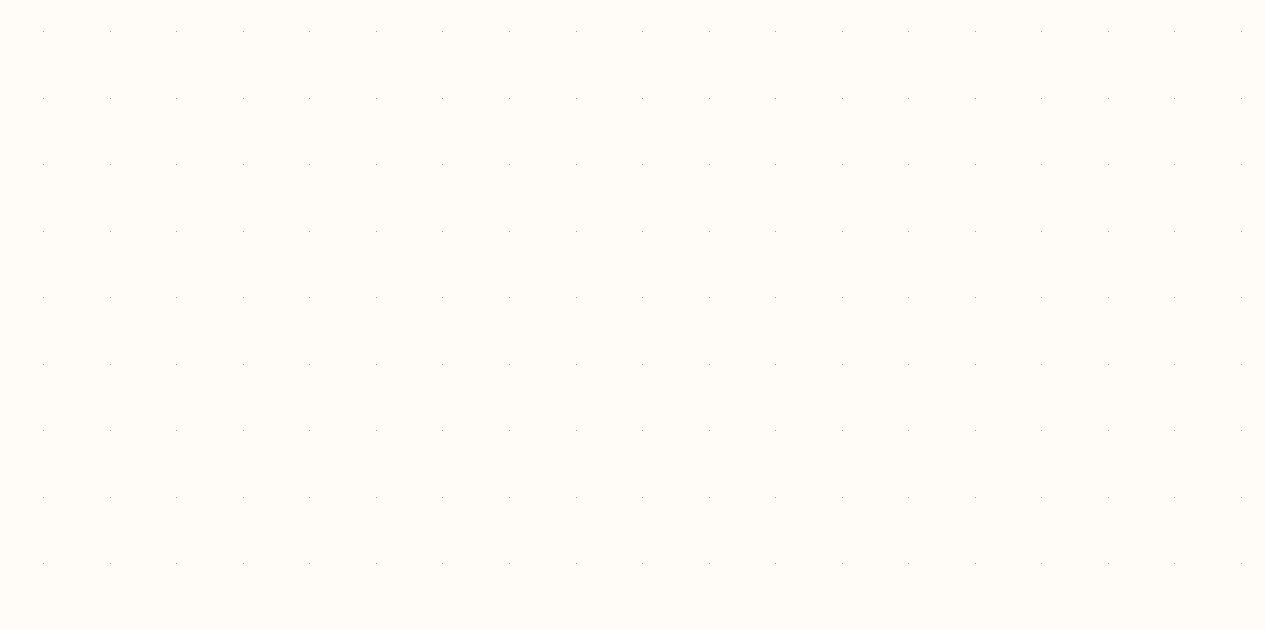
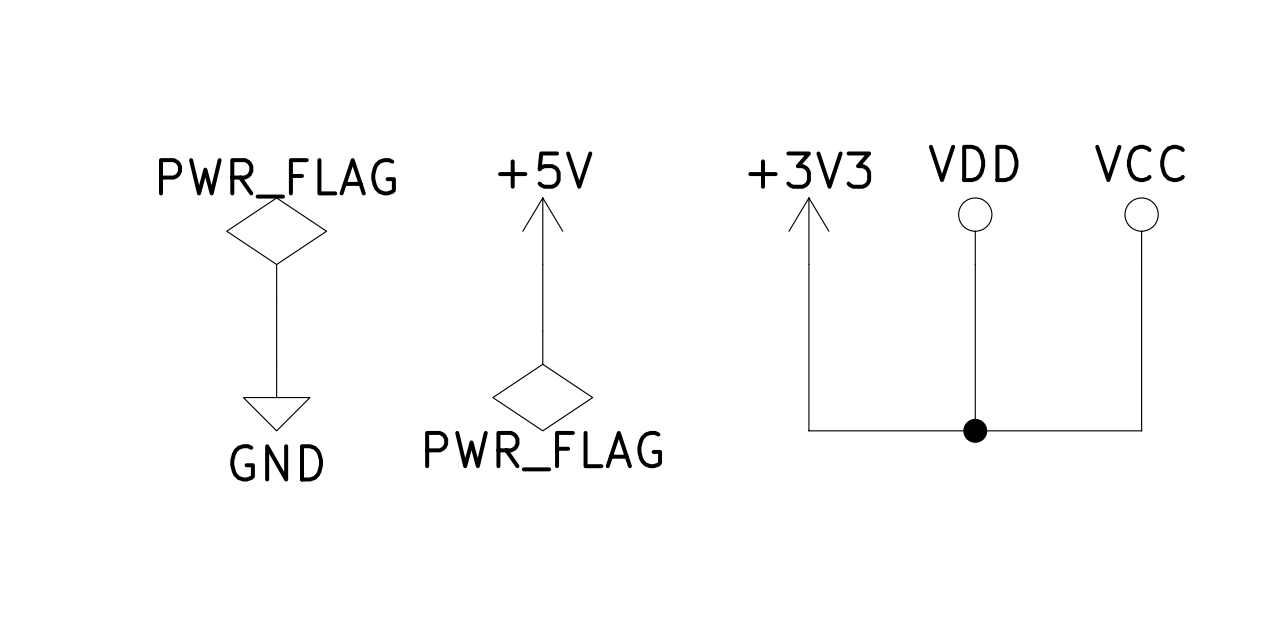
power symbol: none -> +5V (542, 231)
power symbol: none -> +3V3 (808, 231)
power symbol: none -> VDD (975, 231)
power symbol: none -> VCC (1141, 231)
power symbol: none -> PWR_FLAG (276, 247)
wire: none -> (542, 264) (542, 331)
wire: none -> (808, 264) (808, 430) (1141, 430) (1141, 264)
wire: none -> (975, 264) (975, 430)
wire: none -> (276, 297) (276, 364)
power symbol: none -> PWR_FLAG (542, 380)
power symbol: none -> GND (276, 397)
junction: none -> (975, 430)

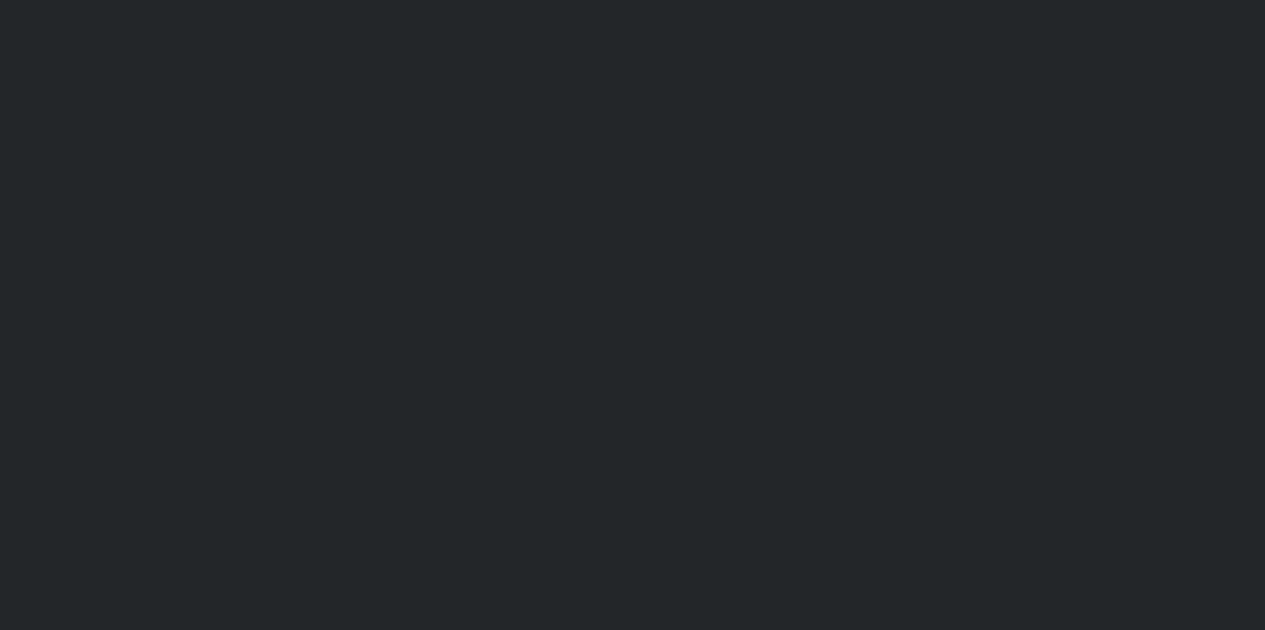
power symbol: +5V (542, 231) -> none
power symbol: +3V3 (808, 231) -> none
power symbol: VDD (975, 231) -> none
power symbol: VCC (1141, 231) -> none
power symbol: PWR_FLAG (276, 247) -> none
wire: (542, 264) (542, 331) -> none
wire: (808, 264) (808, 430) (1141, 430) (1141, 264) -> none
wire: (975, 264) (975, 430) -> none
wire: (276, 297) (276, 364) -> none
power symbol: PWR_FLAG (542, 380) -> none
power symbol: GND (276, 397) -> none
junction: (975, 430) -> none

